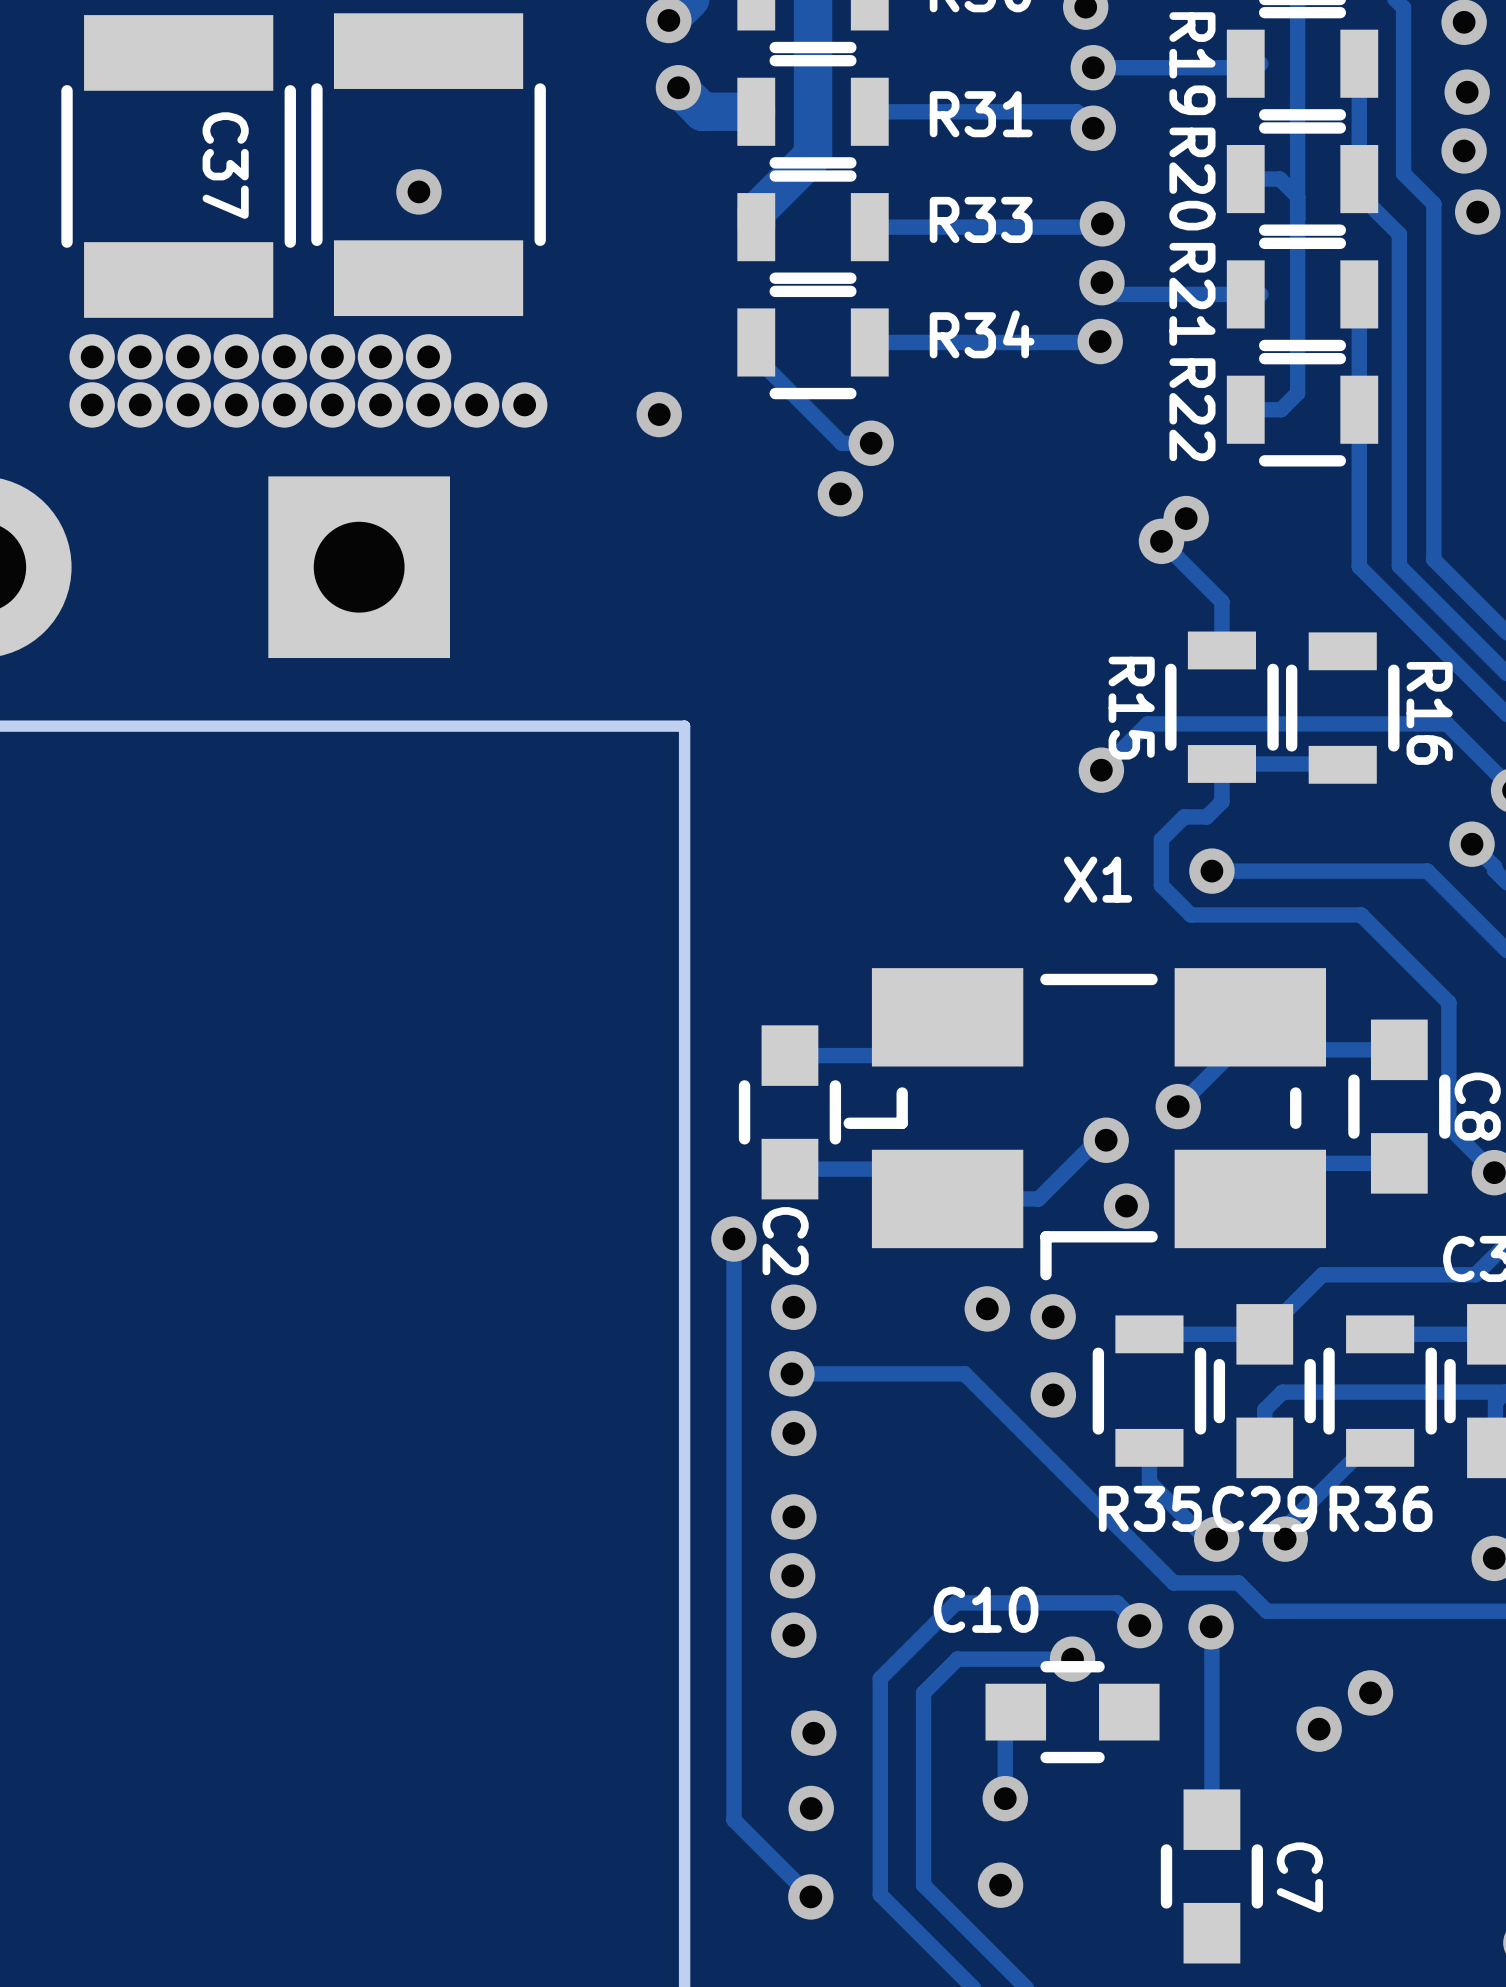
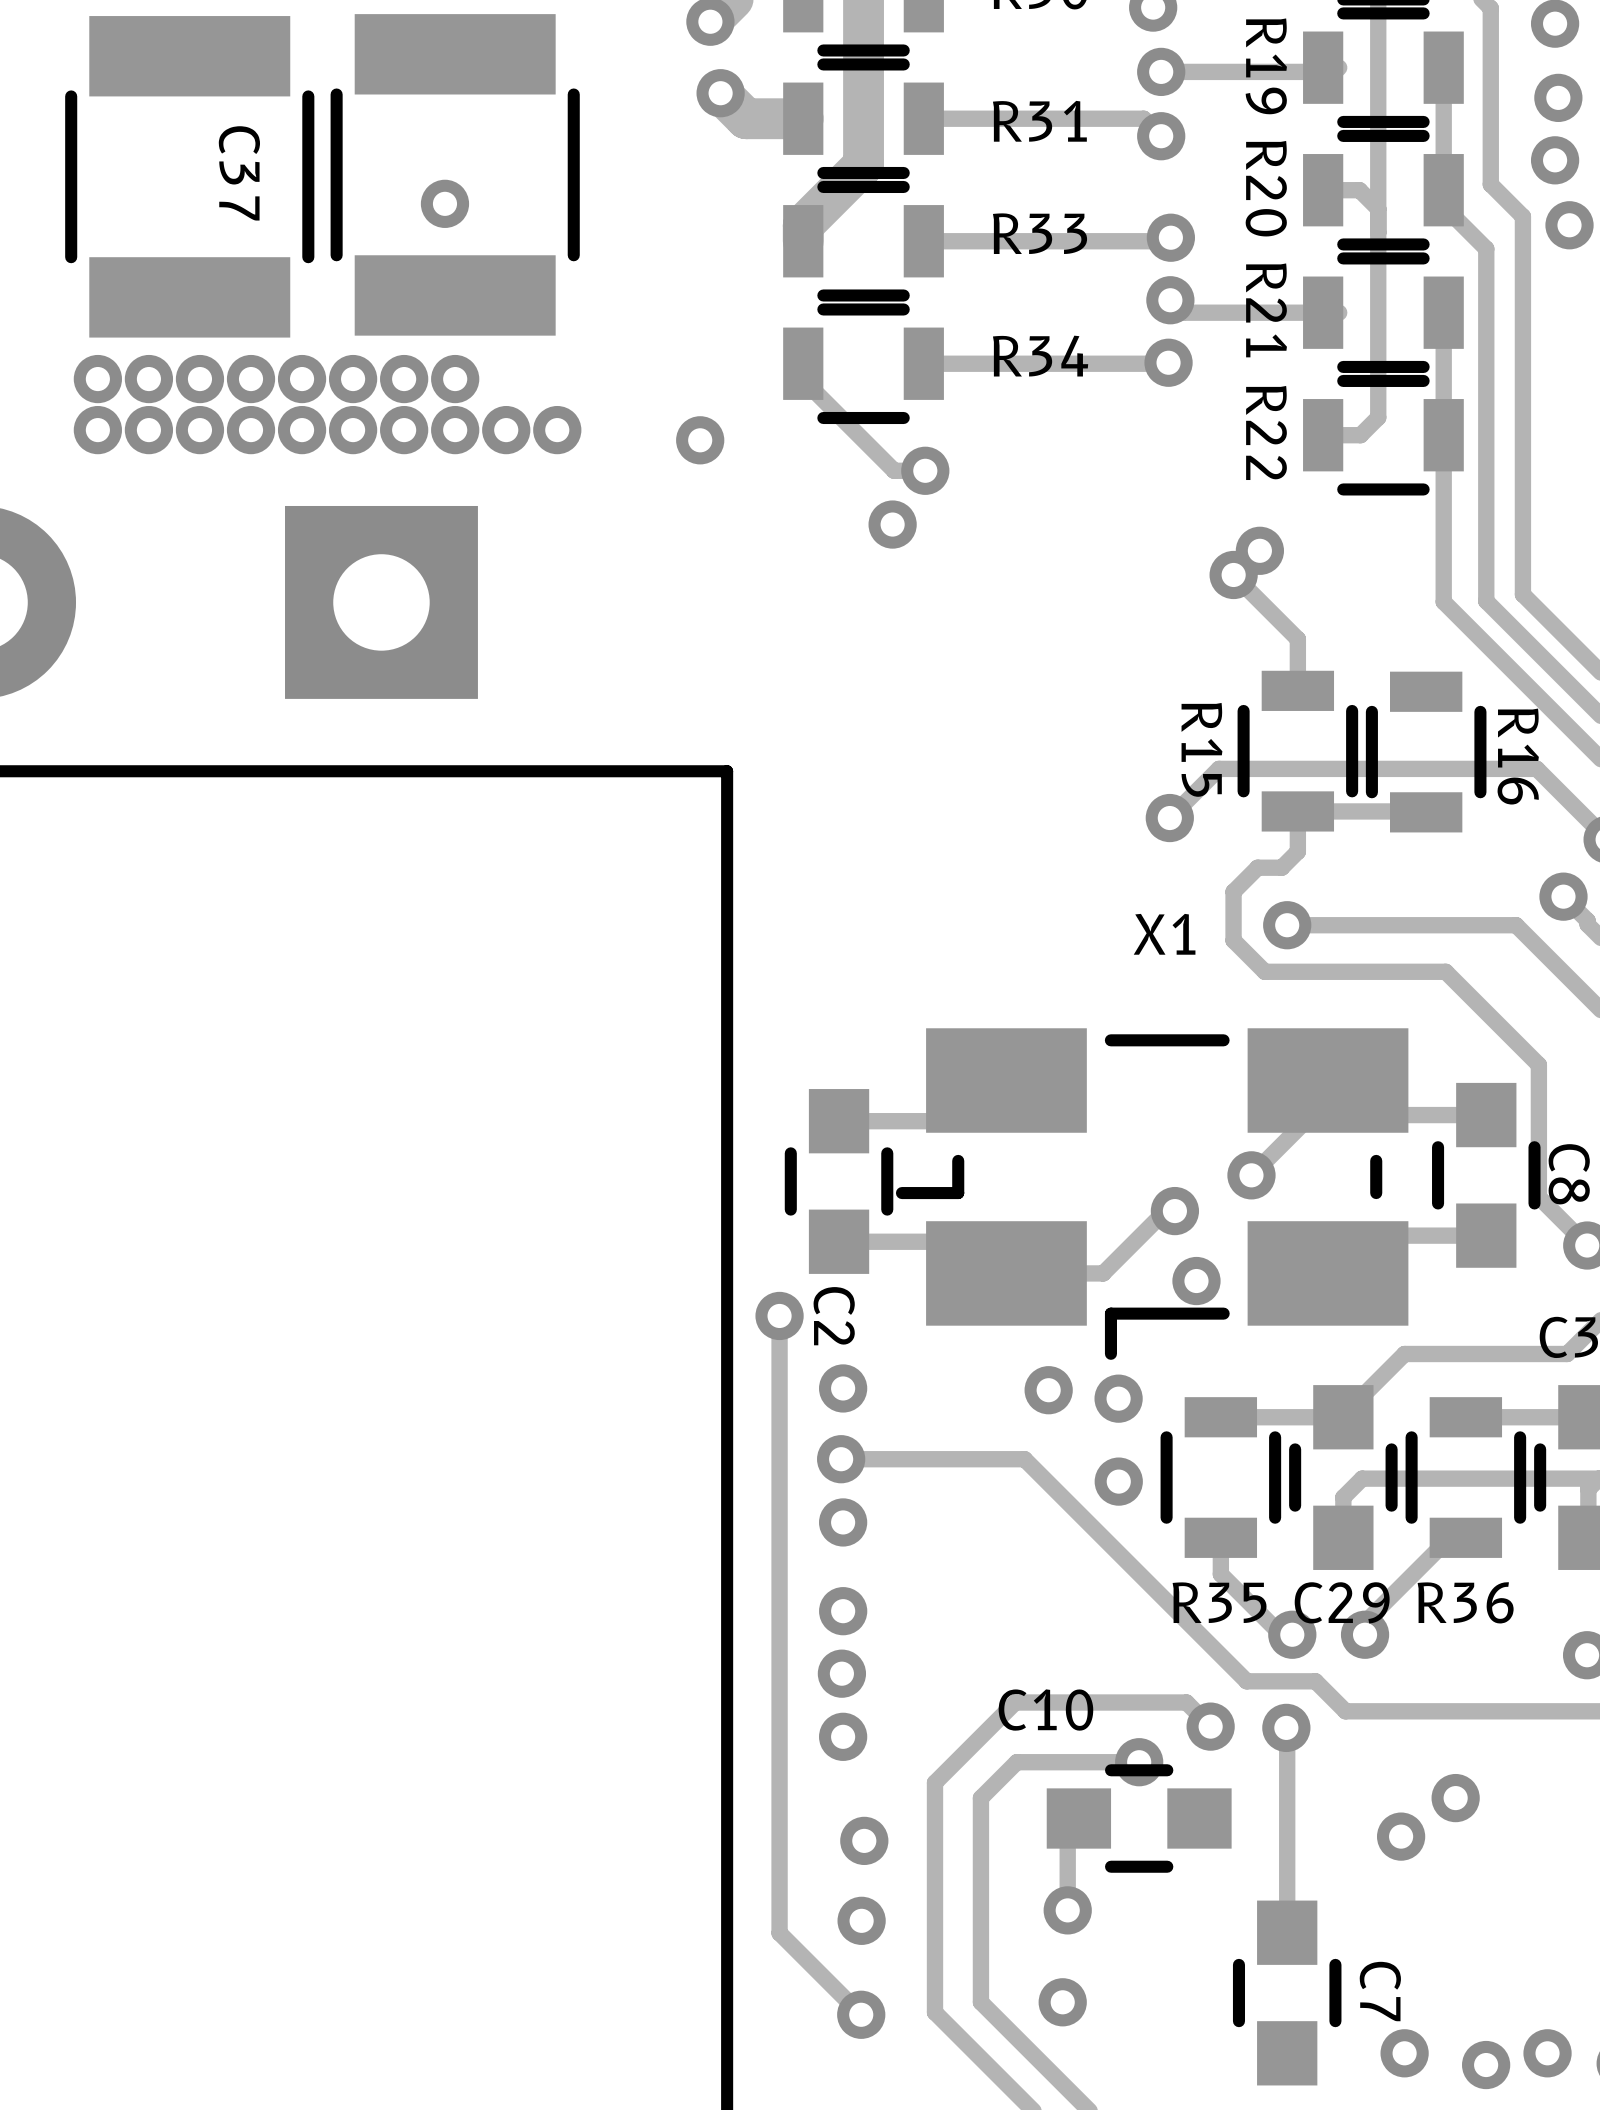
via: none -> (1404, 2053)
via: none -> (1547, 2053)
via: none -> (1486, 2065)

